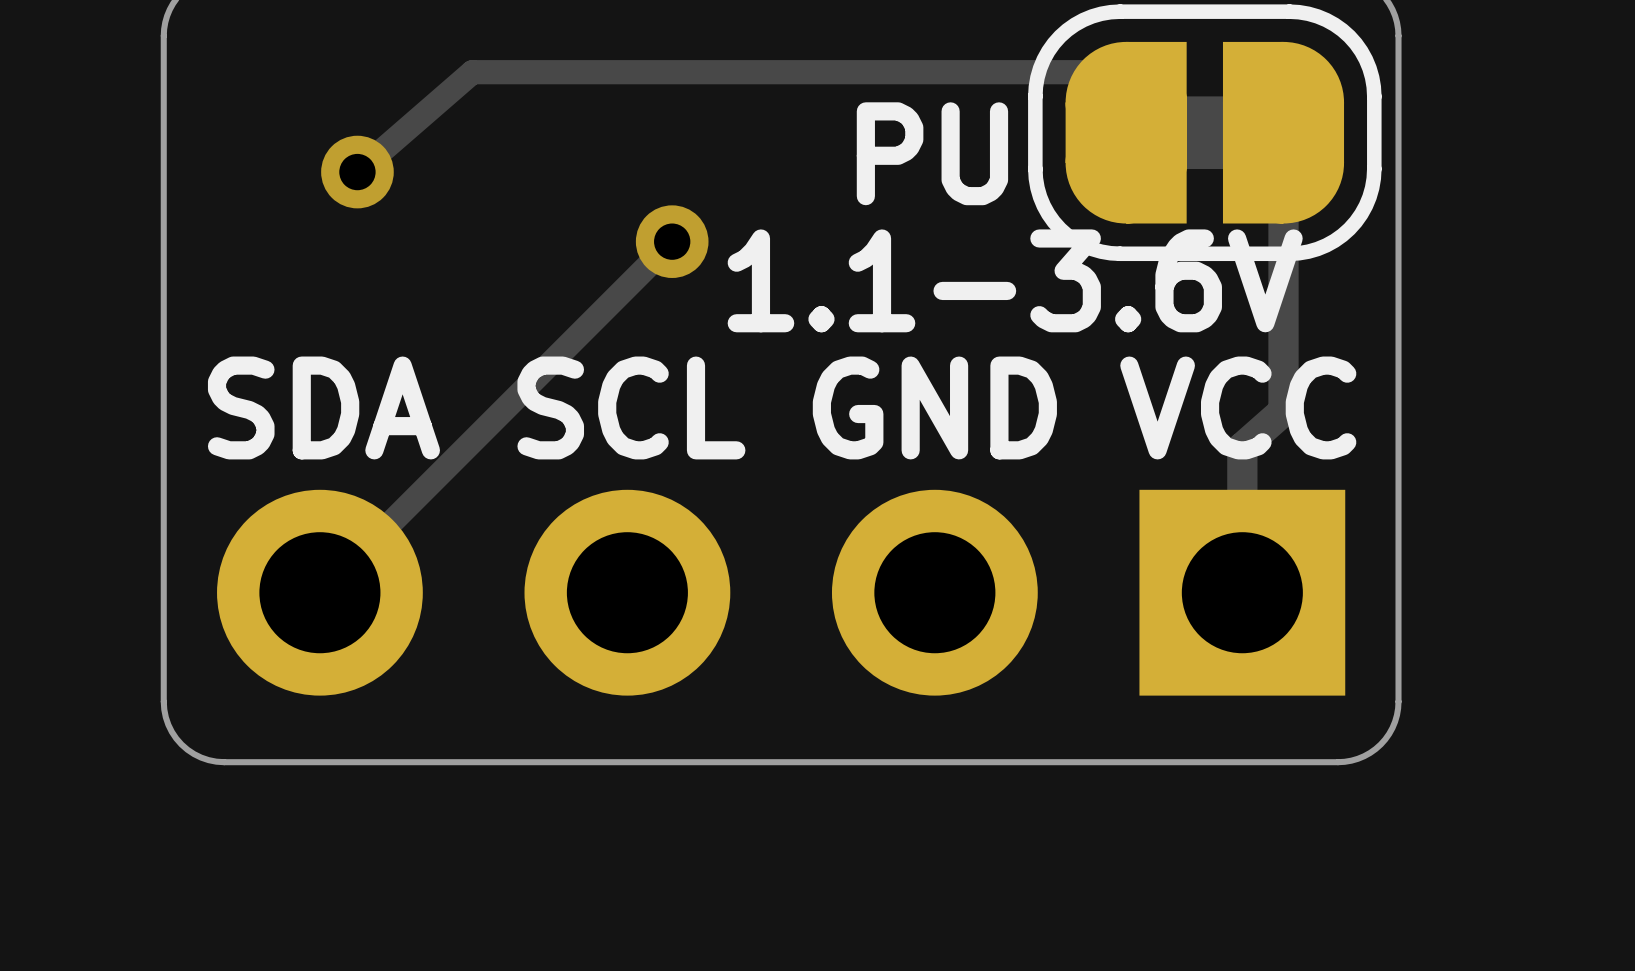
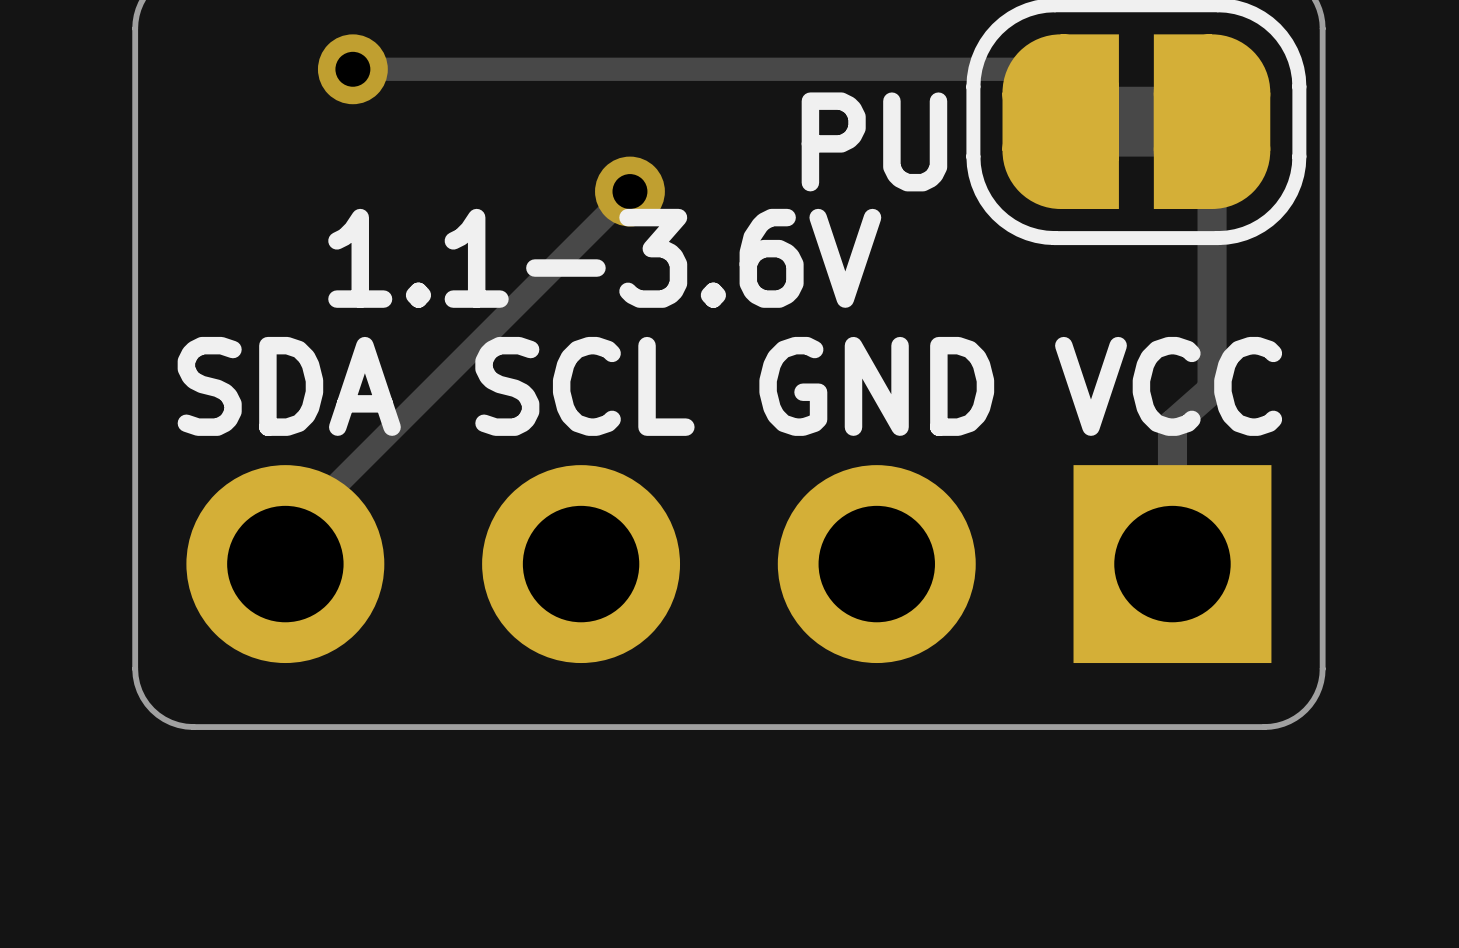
track: (1126, 78) (1126, 72) (472, 72) (357, 172) -> (1060, 69) (352, 69)
via position: (357, 172) -> (352, 69)
track: (672, 241) (319, 593) -> (629, 191) (285, 536) (285, 564)
via position: (672, 241) -> (629, 191)
text position: 1.1-3.6V (1015, 280) -> 1.1-3.6V (604, 258)

